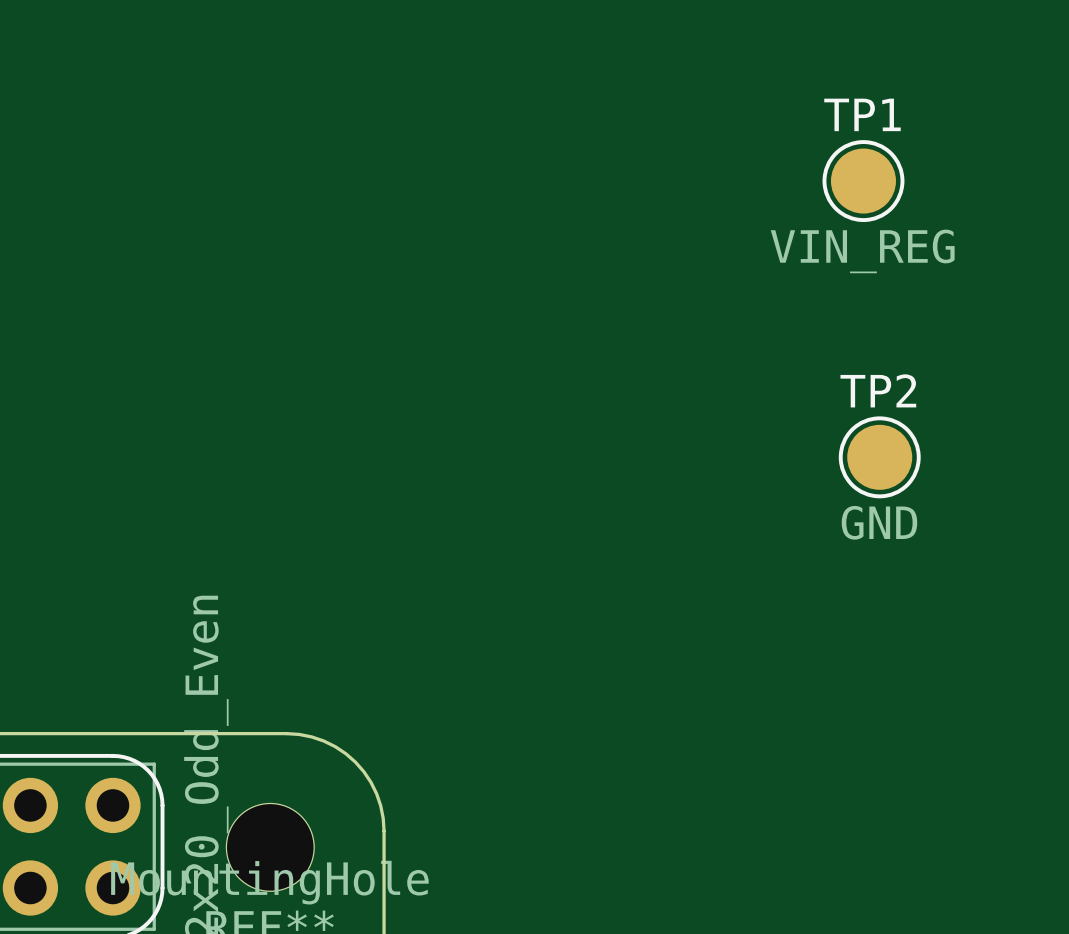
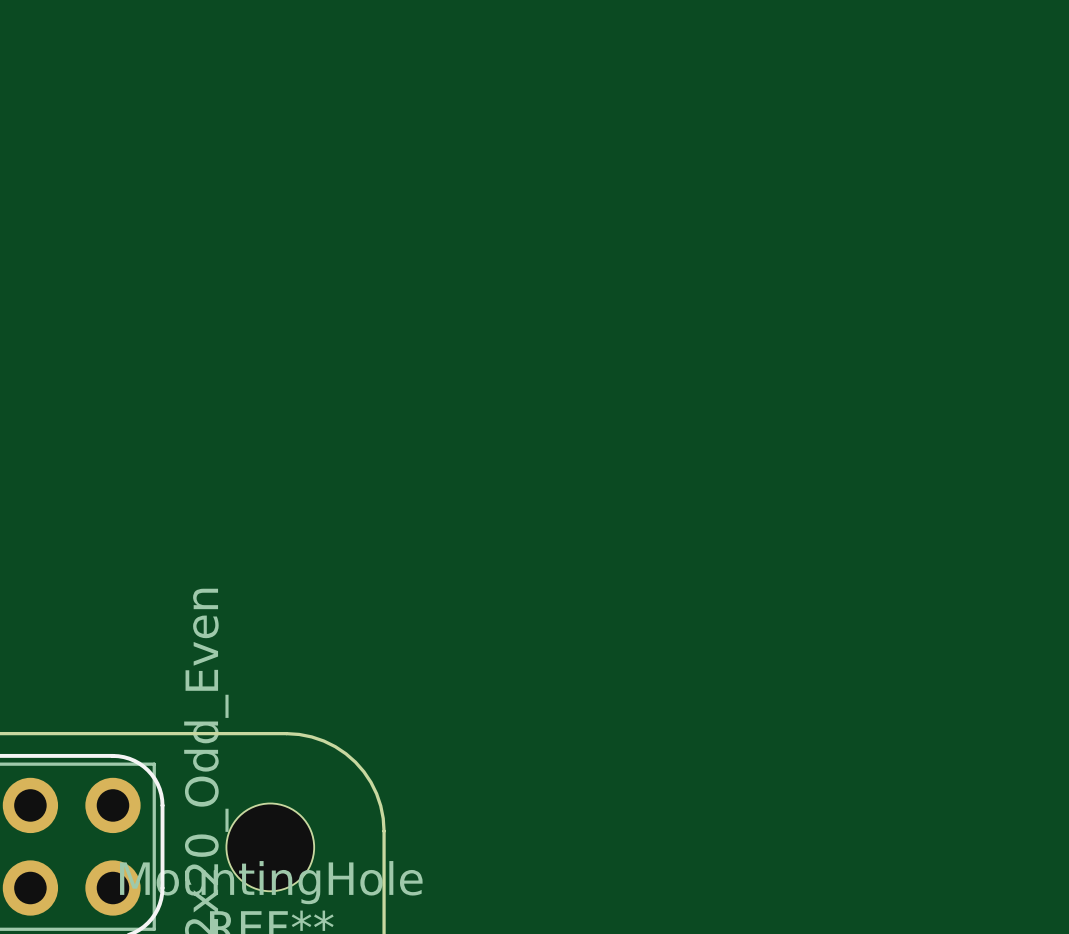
TP1: VIN_REG (863, 181) -> none
TP2: GND (879, 457) -> none

